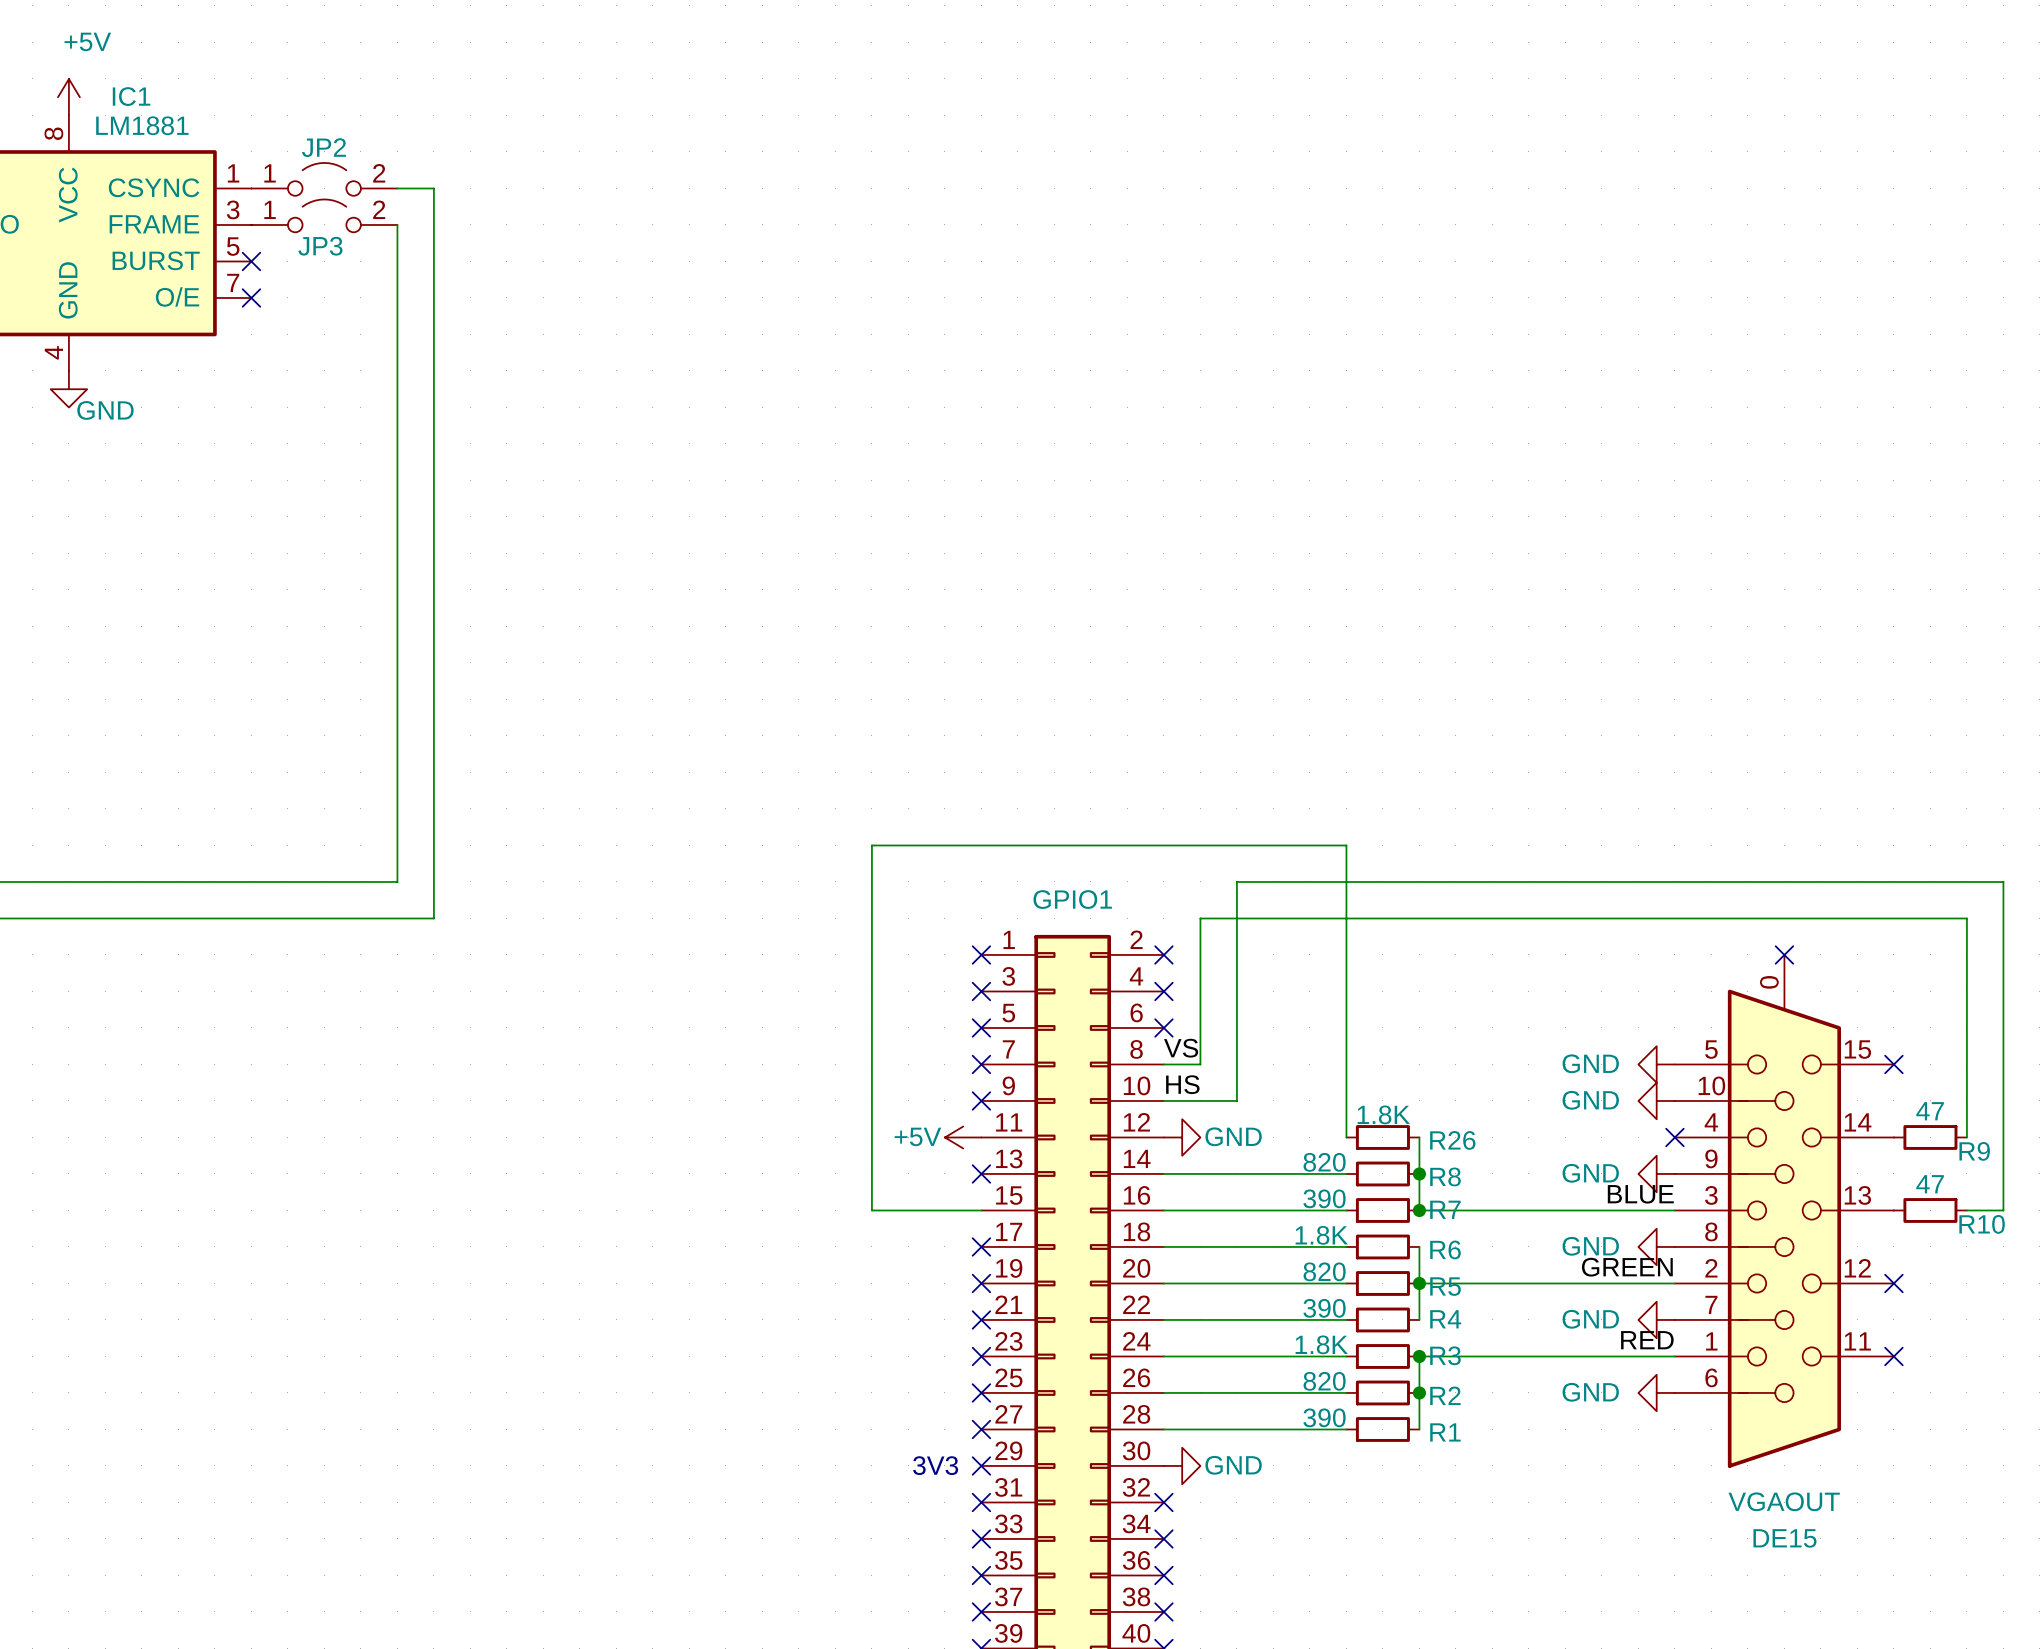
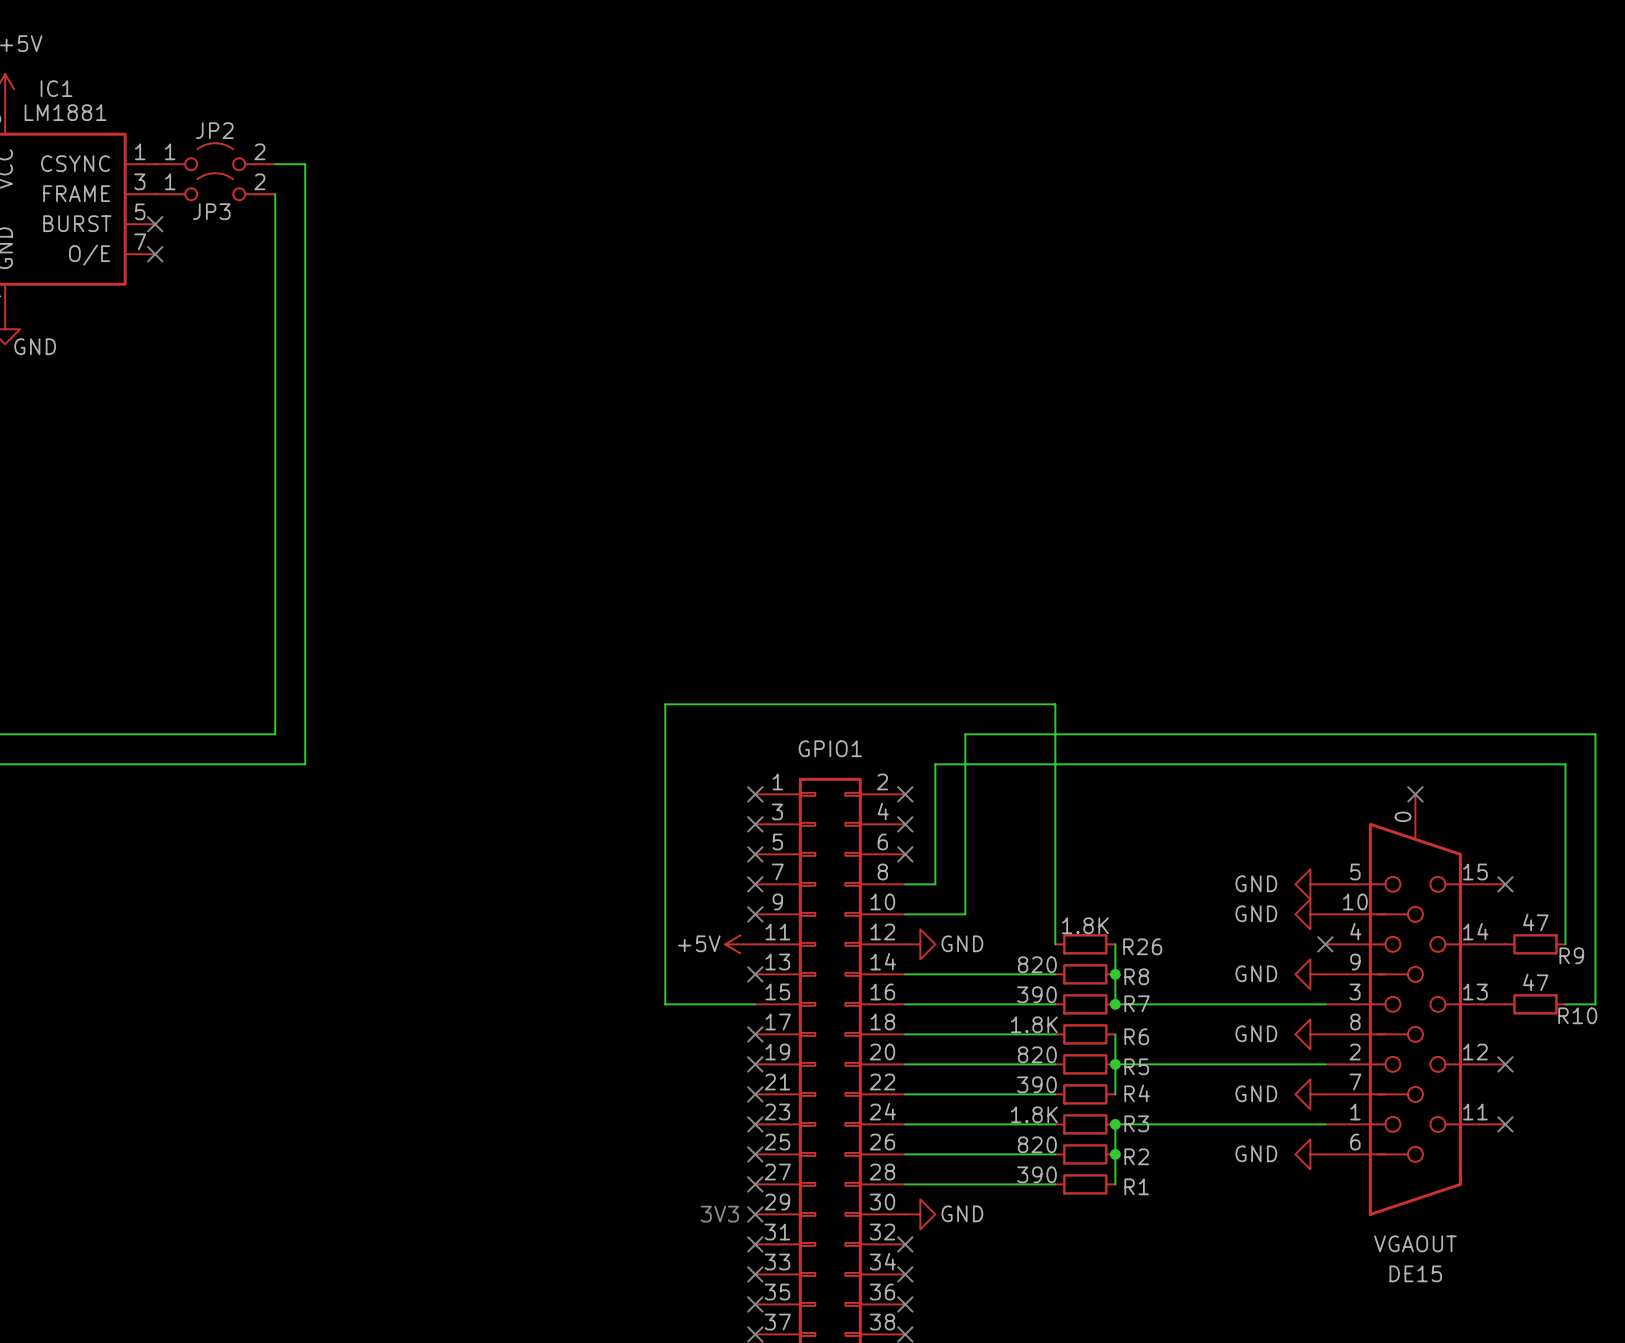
label: VS (1181, 1048) -> none
label: HS (1182, 1084) -> none
label: BLUE (1640, 1194) -> none
label: GREEN (1627, 1267) -> none
label: RED (1647, 1340) -> none

